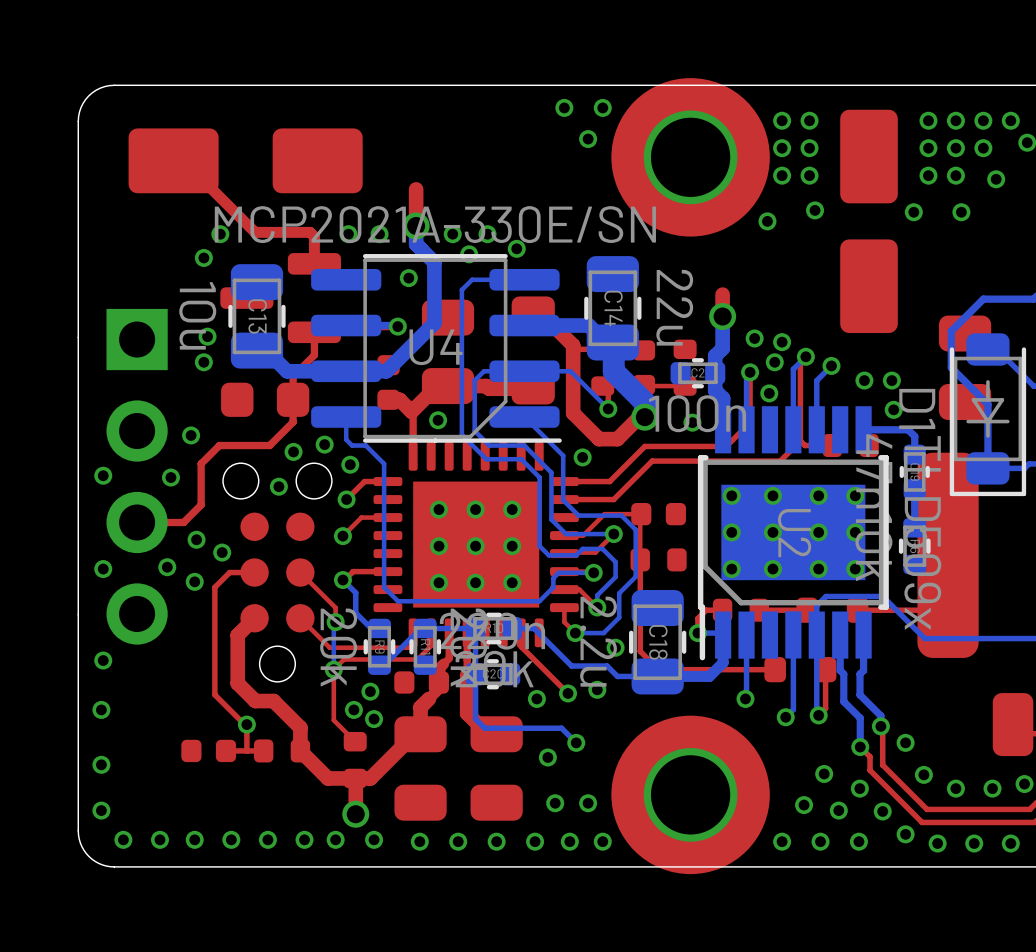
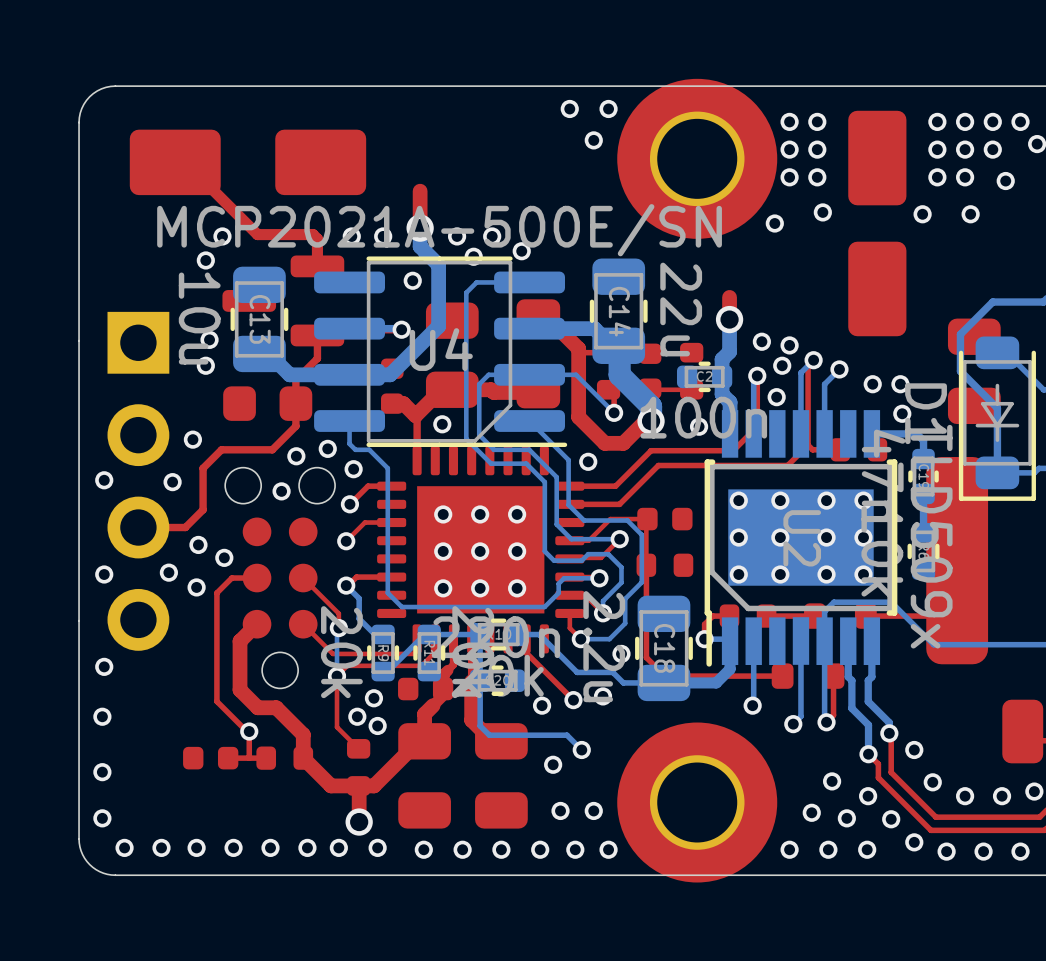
U4 value: MCP2021A-330E/SN (435, 224) -> MCP2021A-500E/SN (439, 230)

